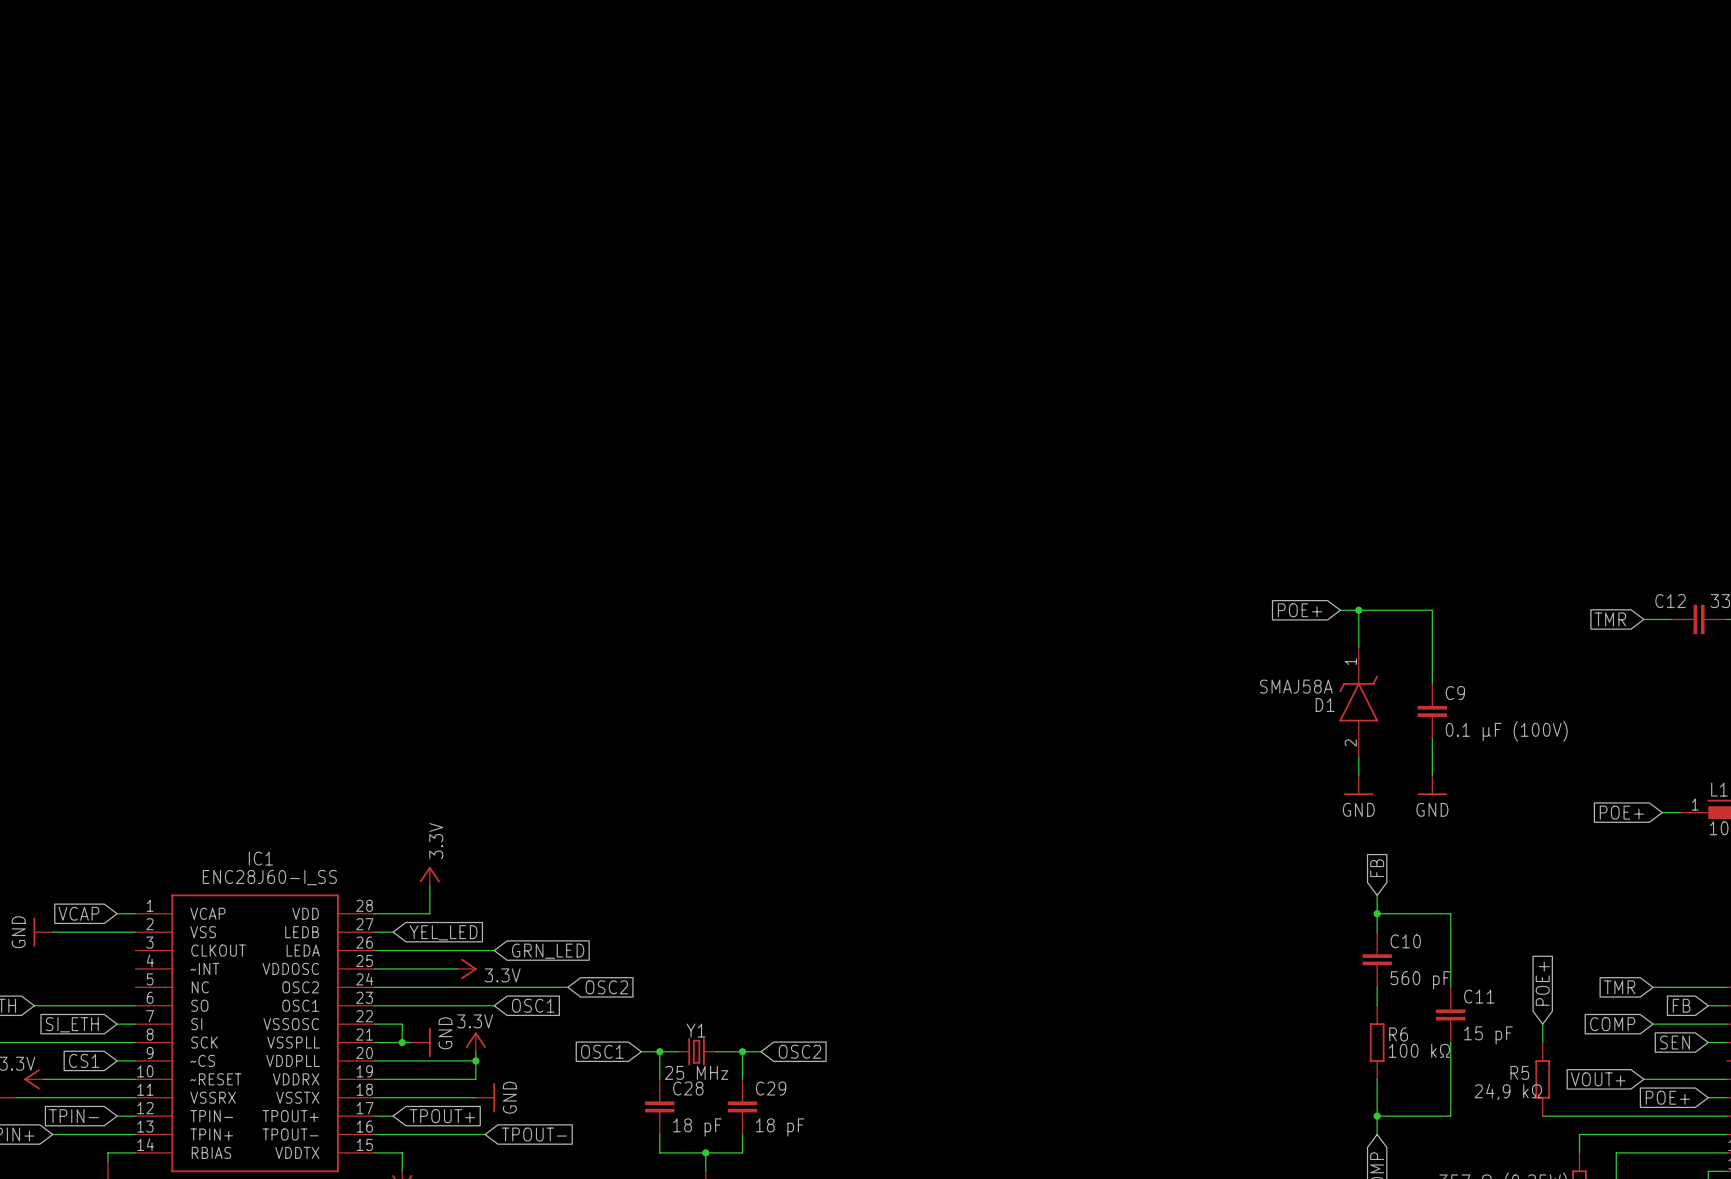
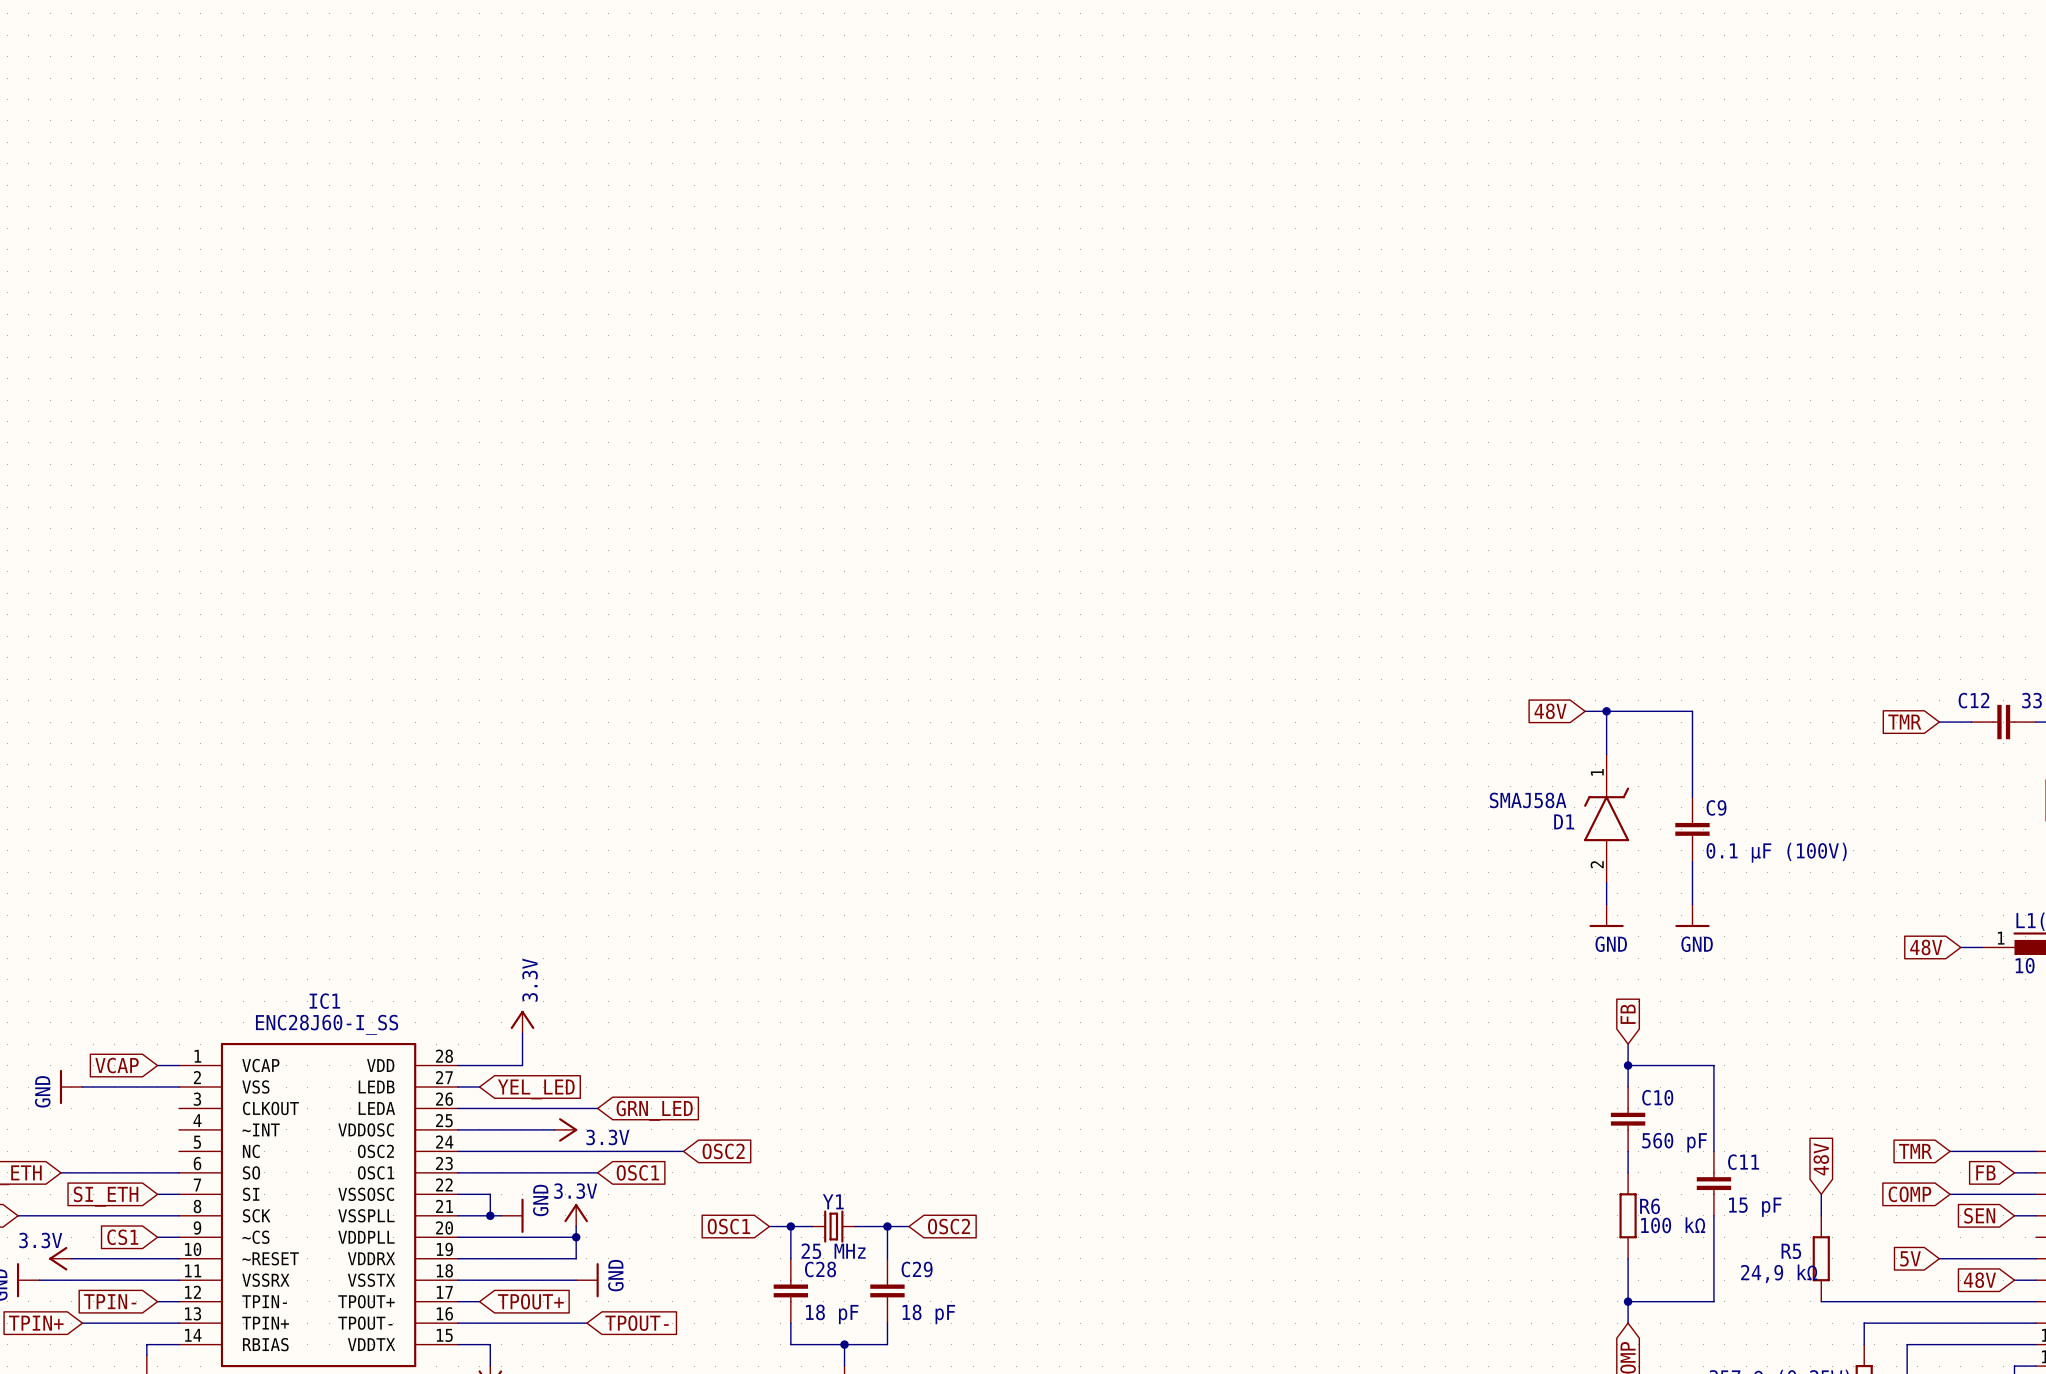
global label: POE+ (1299, 610) -> 48V (1550, 711)
global label: POE+ (1621, 812) -> 48V (1926, 947)
global label: POE+ (1542, 983) -> 48V (1821, 1159)
global label: VOUT+ (1598, 1079) -> 5V (1910, 1258)
global label: POE+ (1667, 1097) -> 48V (1979, 1280)

